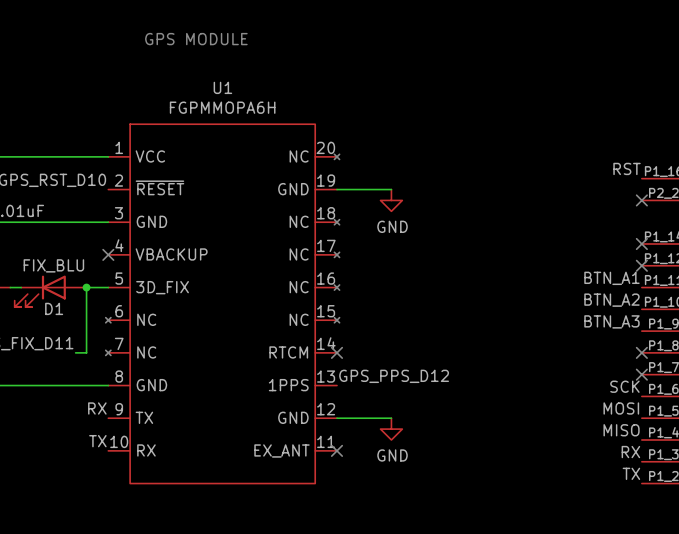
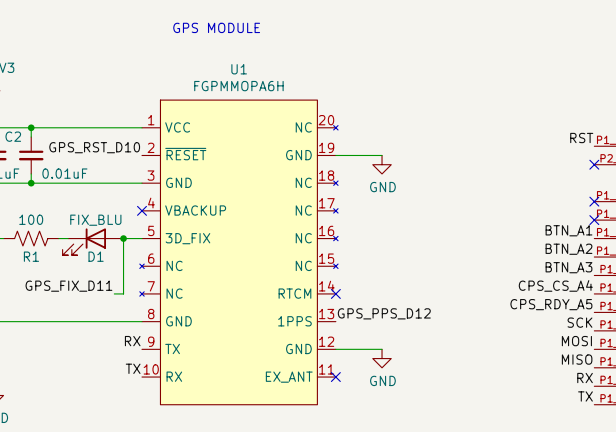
label: none -> CPS_CS_A4 (555, 285)
no-connect mark: (641, 352) -> none
label: none -> CPS_RDY_A5 (551, 304)
no-connect mark: (641, 374) -> none

